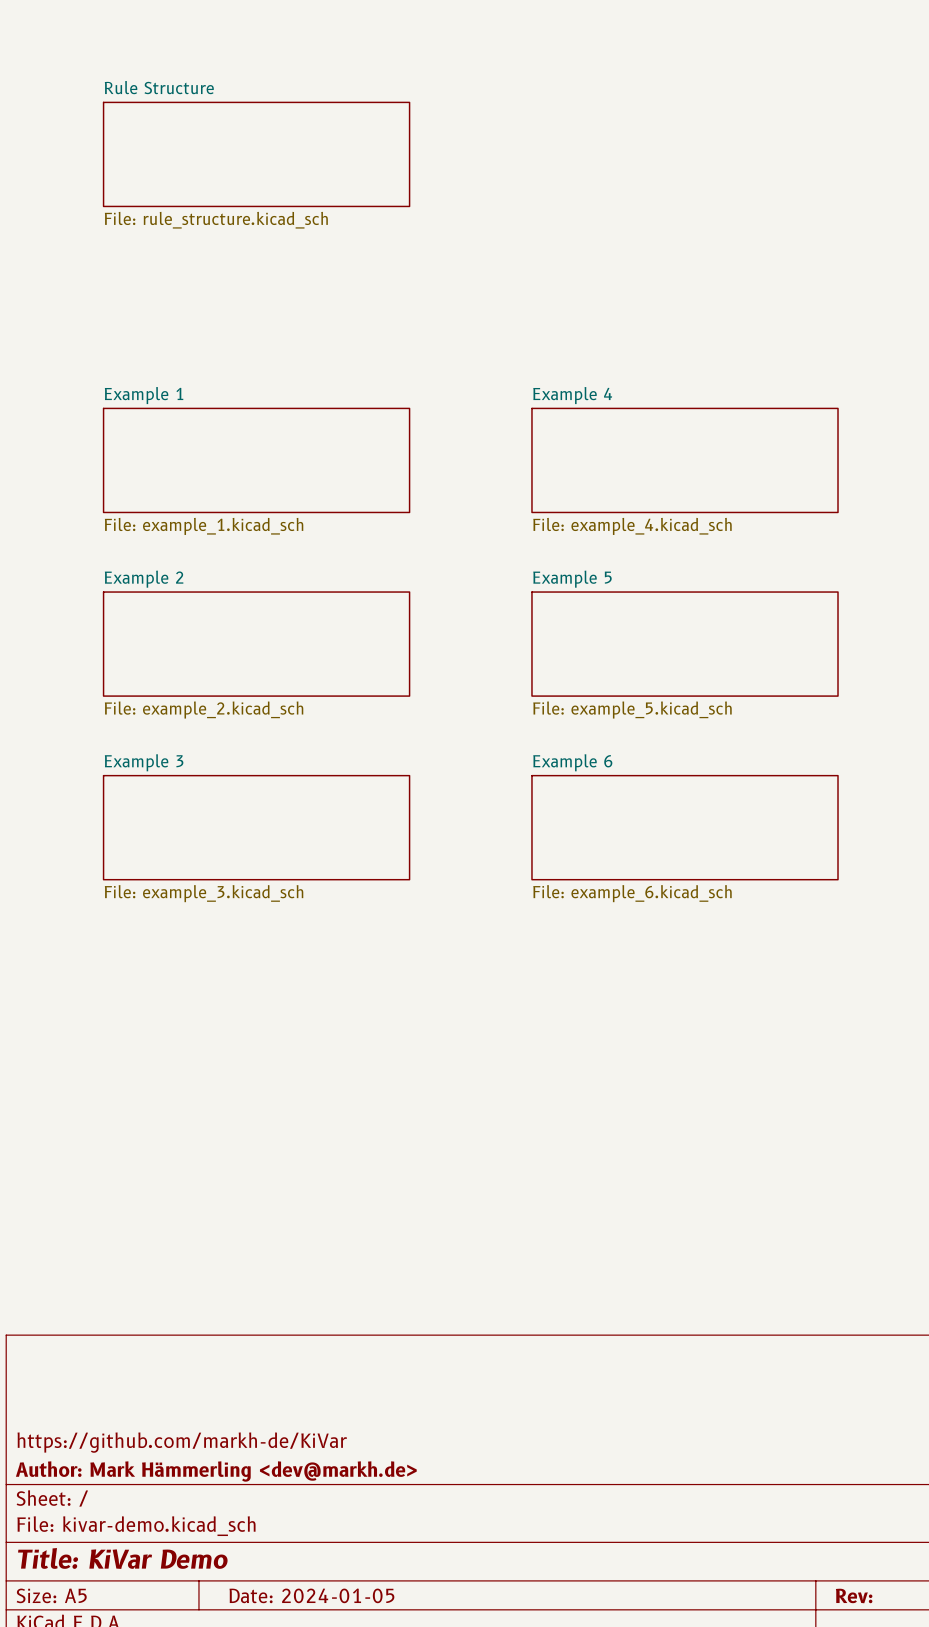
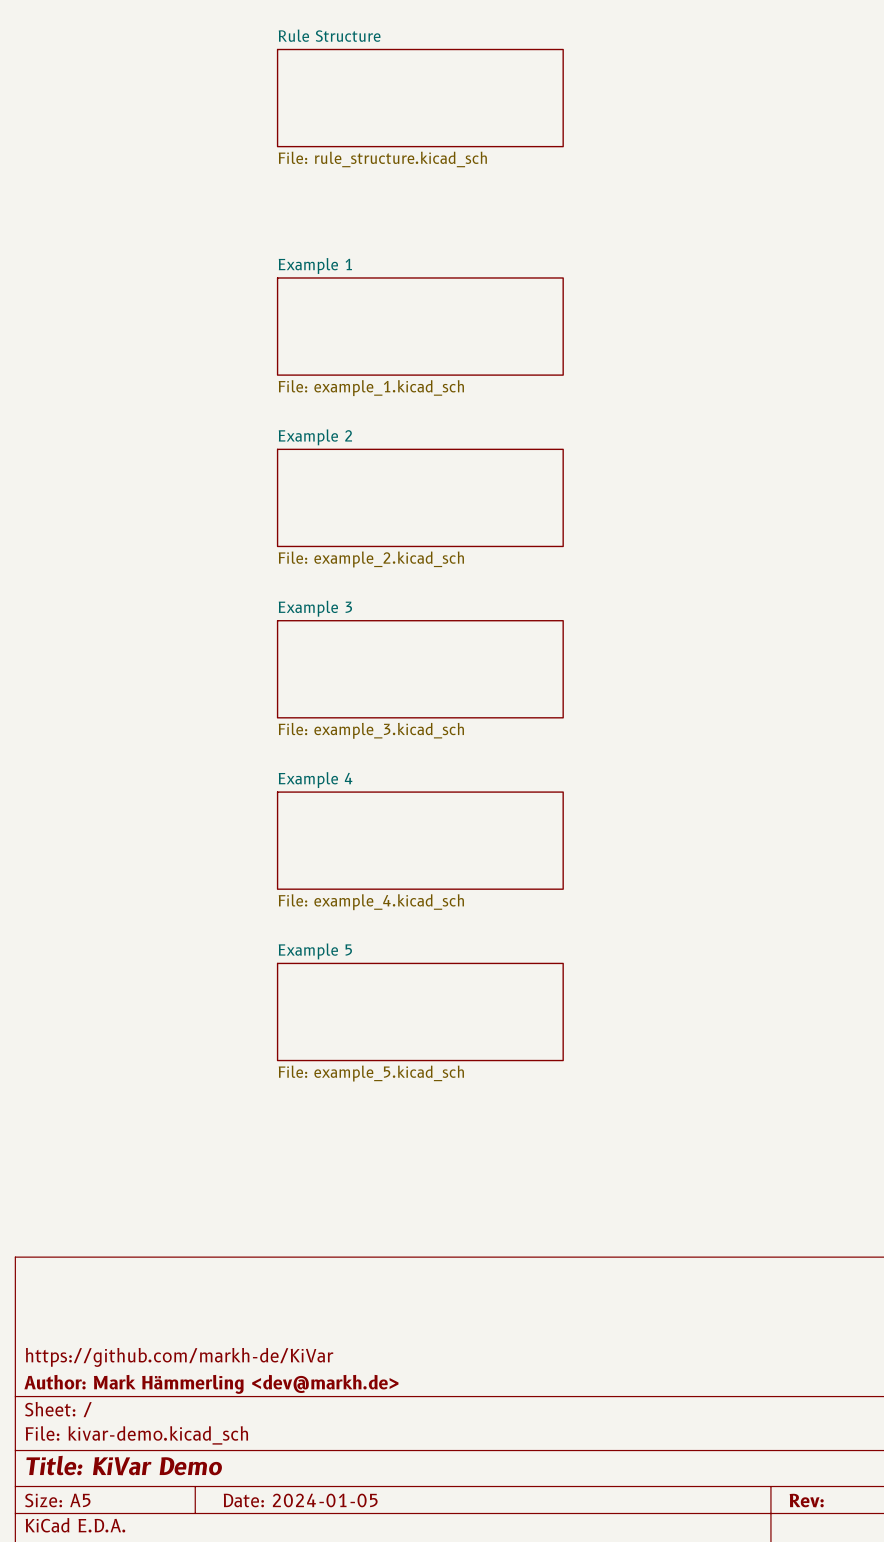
sheet Rule Structure position: (256, 154) -> (420, 98)
sheet Example 1 position: (256, 460) -> (420, 326)
sheet Example 4 position: (684, 460) -> (420, 840)
sheet Example 2 position: (256, 644) -> (420, 497)
sheet Example 5 position: (684, 644) -> (420, 1011)
sheet Example 3 position: (256, 827) -> (420, 669)
sheet Example 6: File: example_6.kicad_sch (684, 827) -> none

